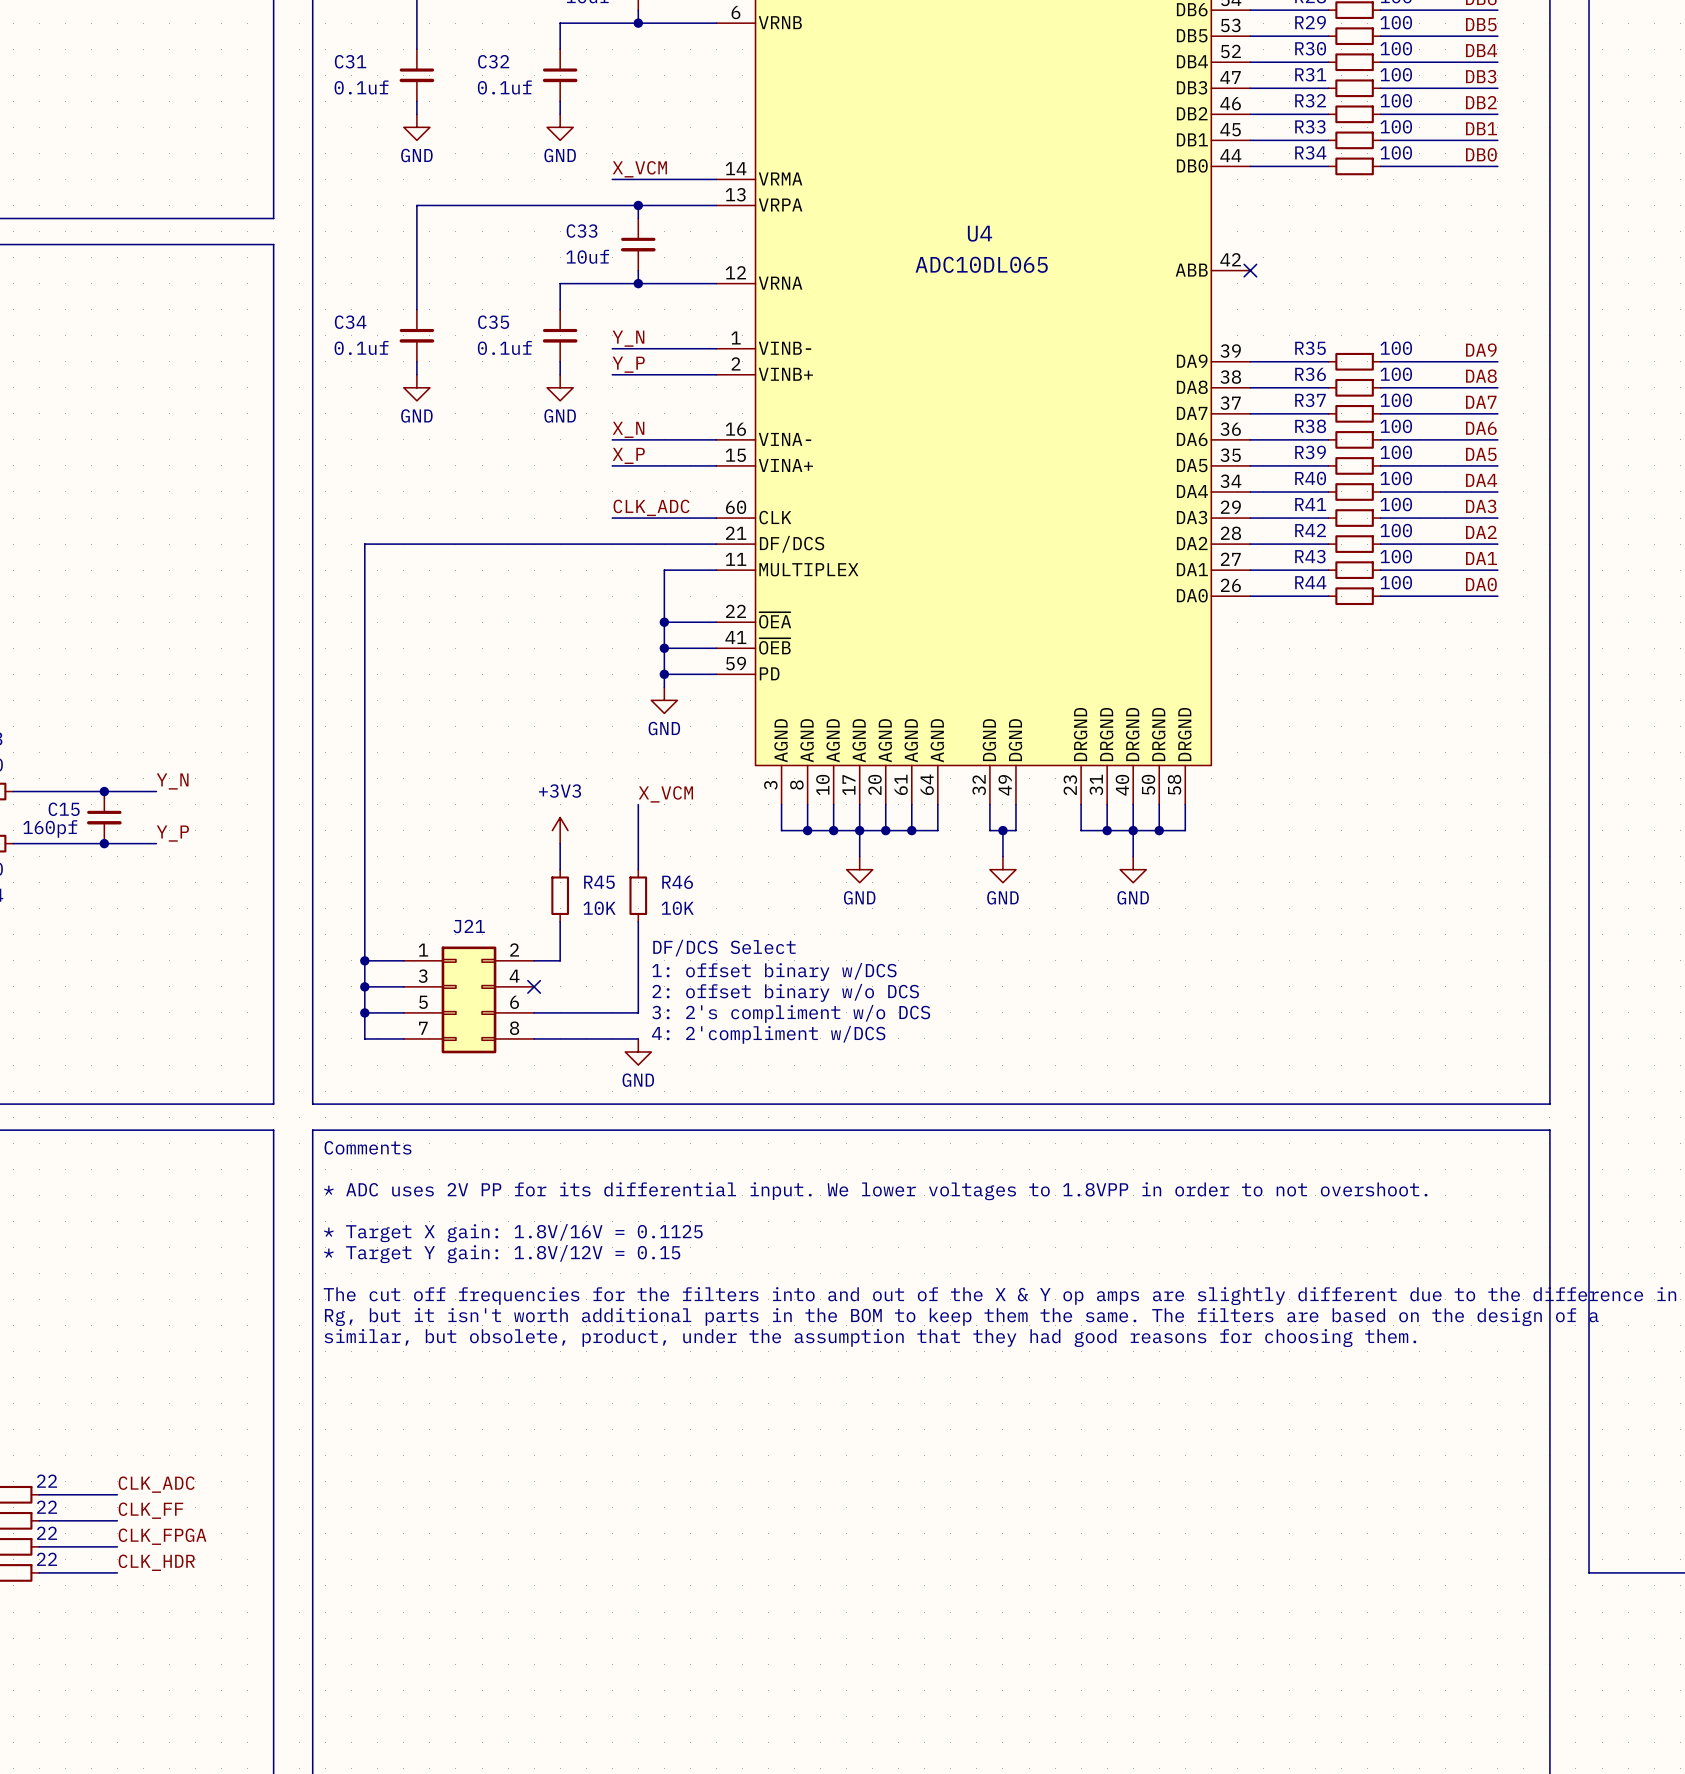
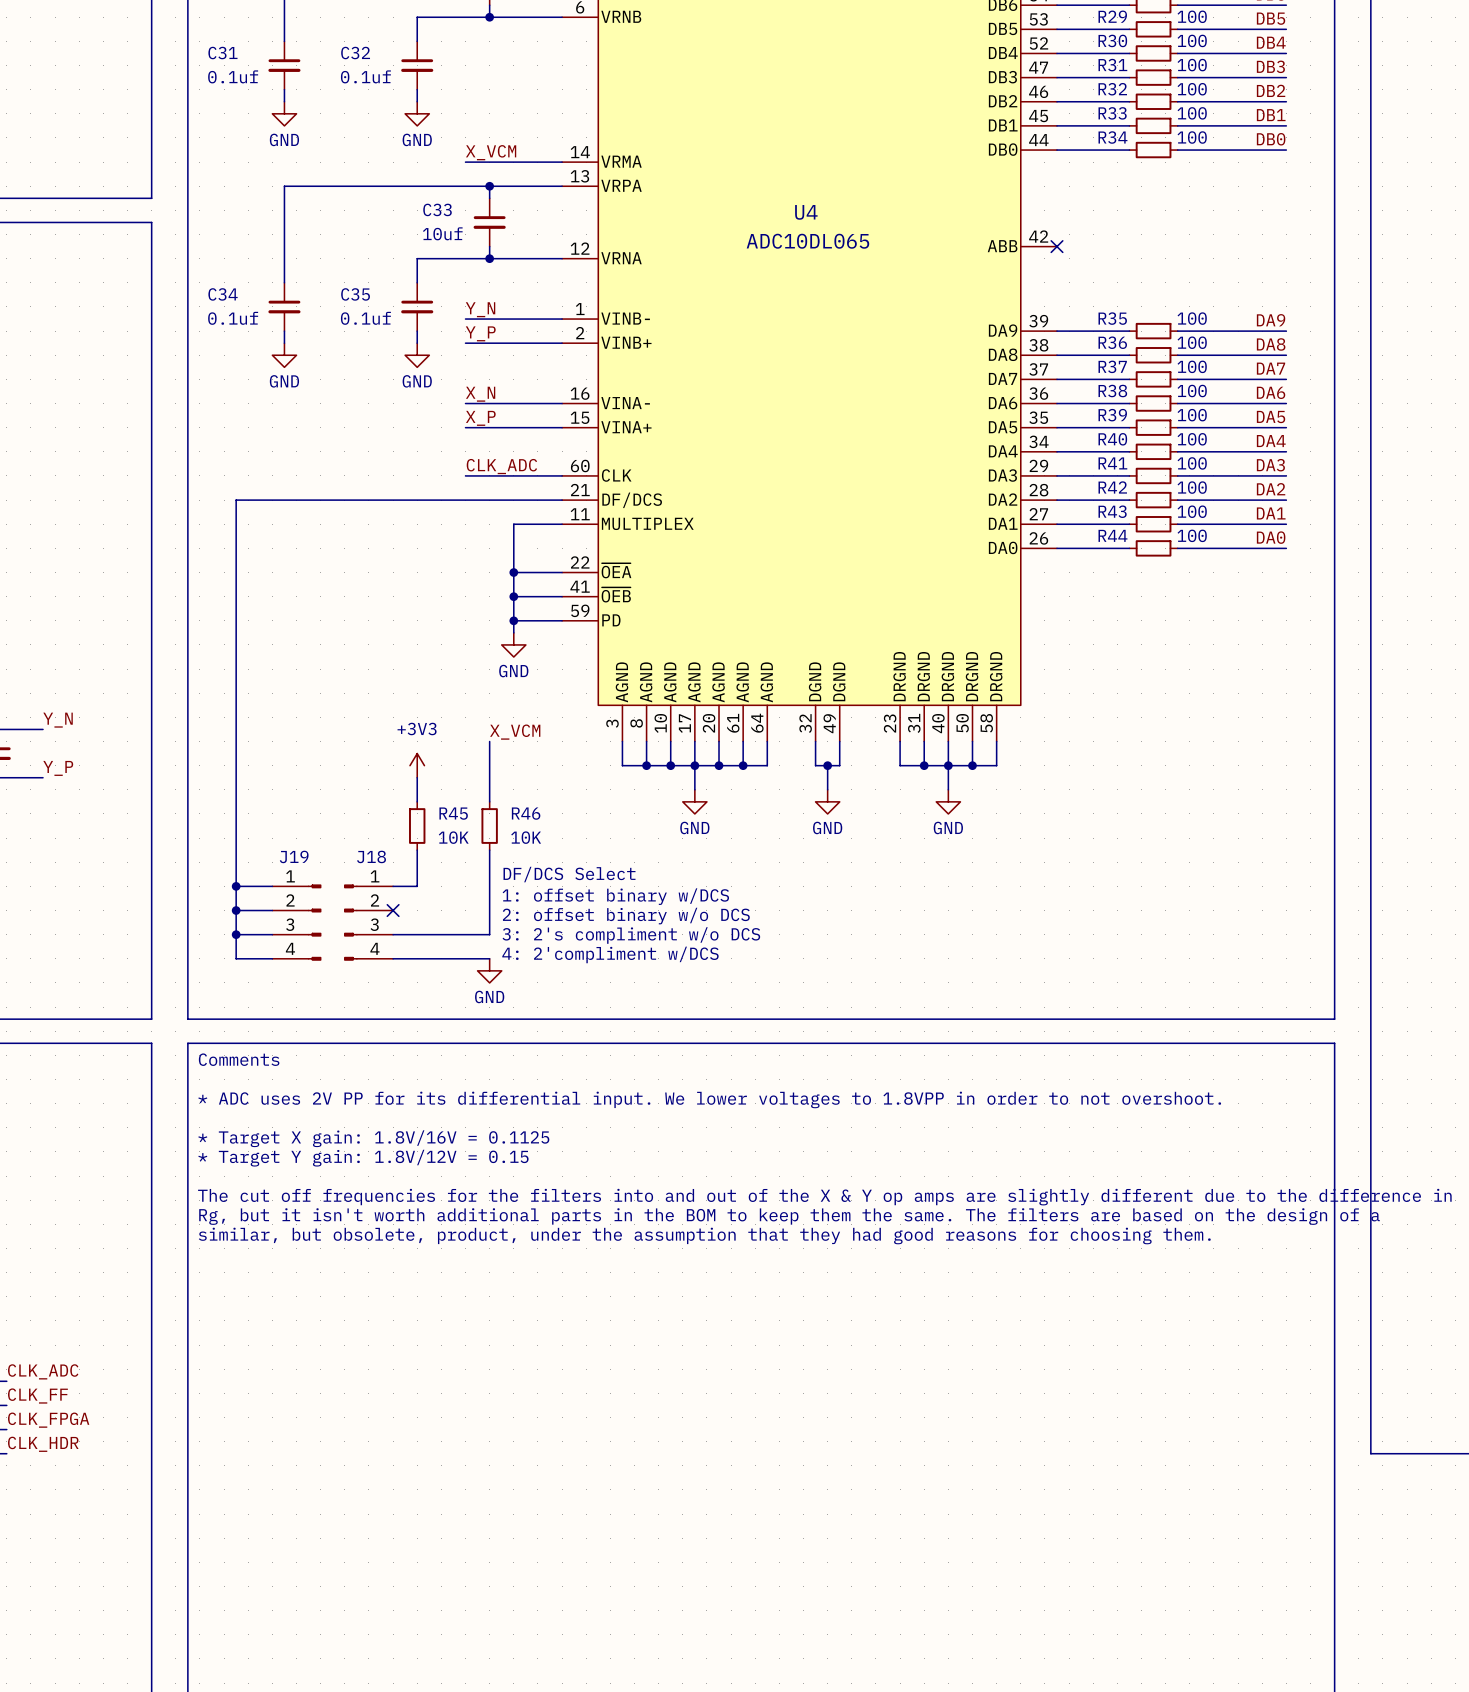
J19: none -> (296, 922)
J21: (469, 999) -> none
J18: none -> (368, 922)

